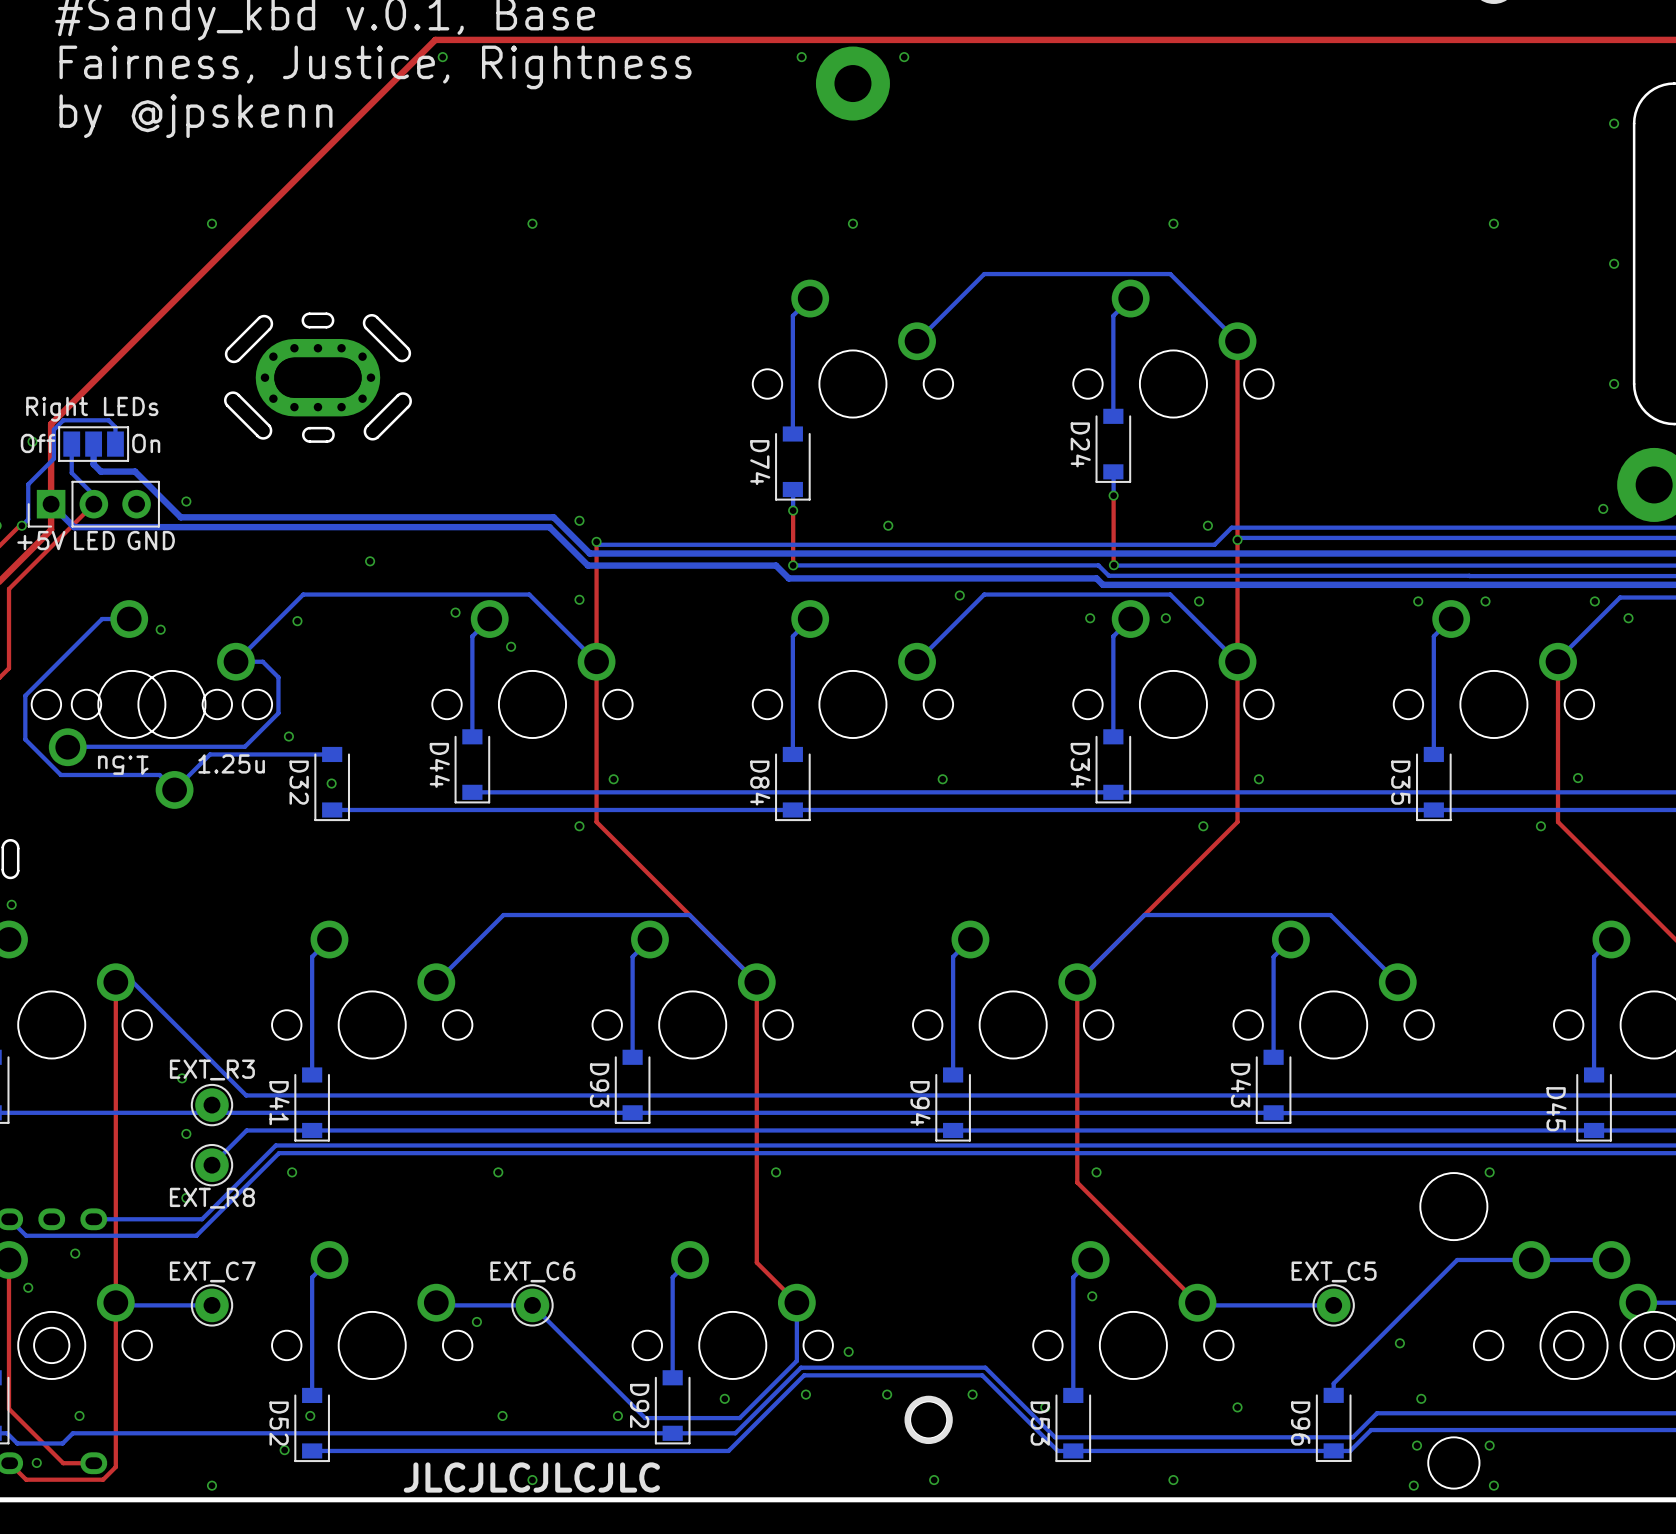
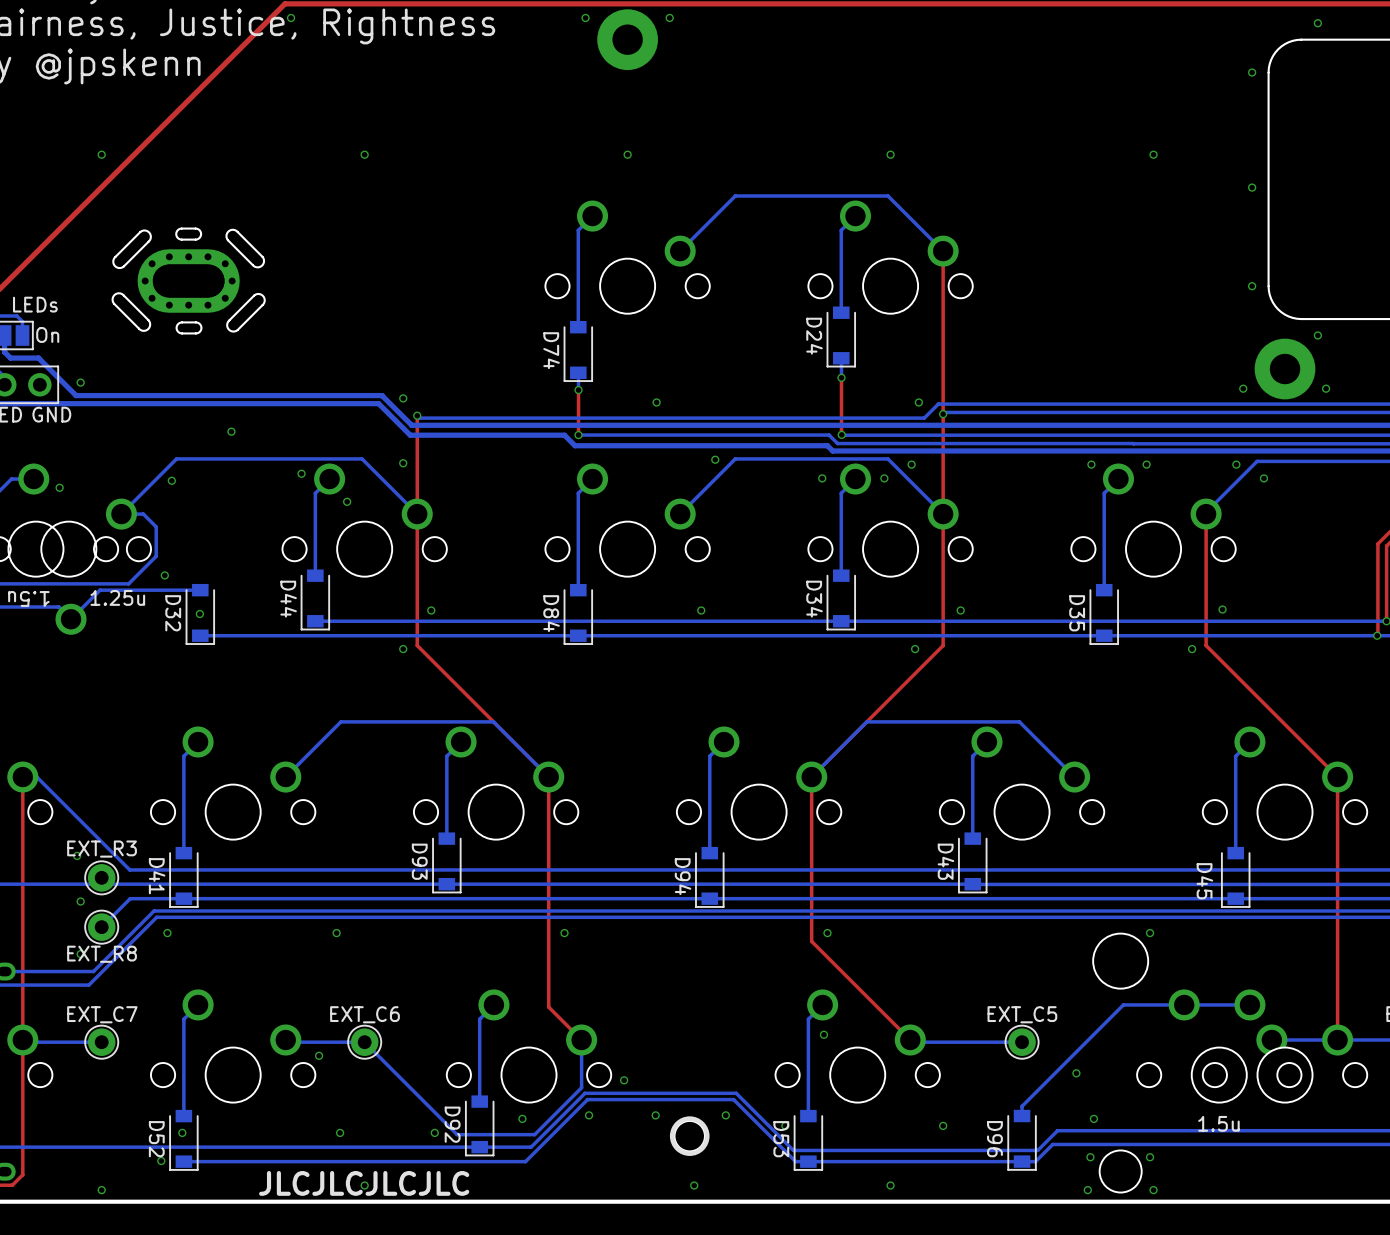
part text: none -> 1.5u (1218, 1123)

